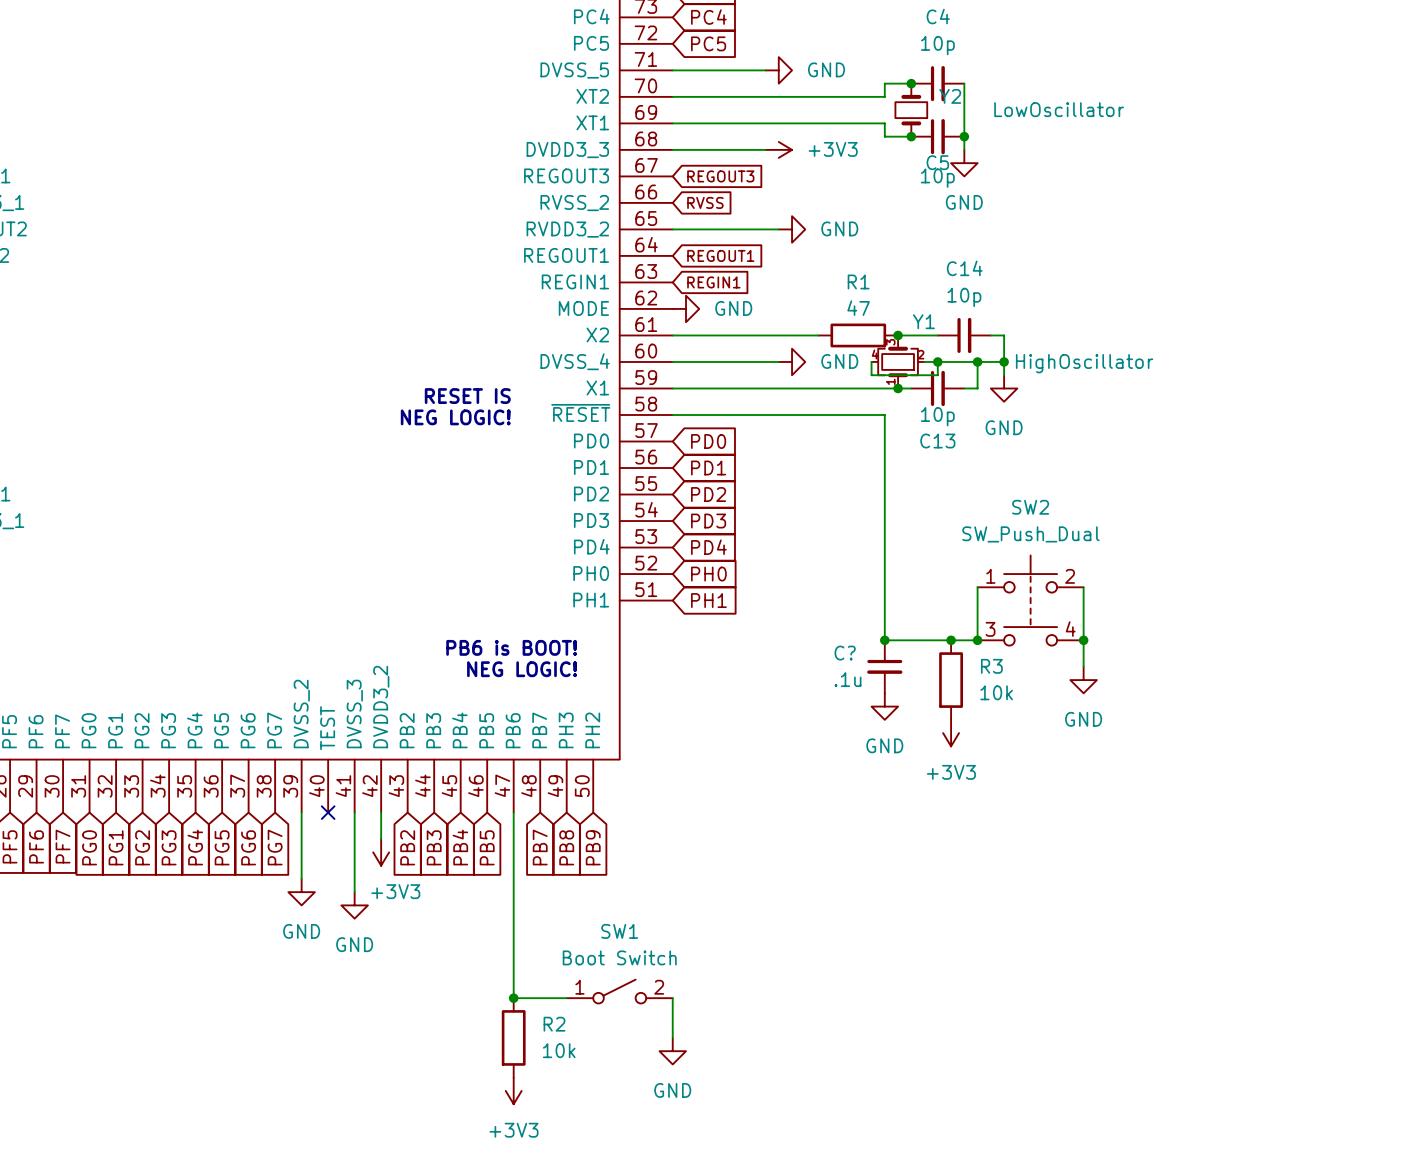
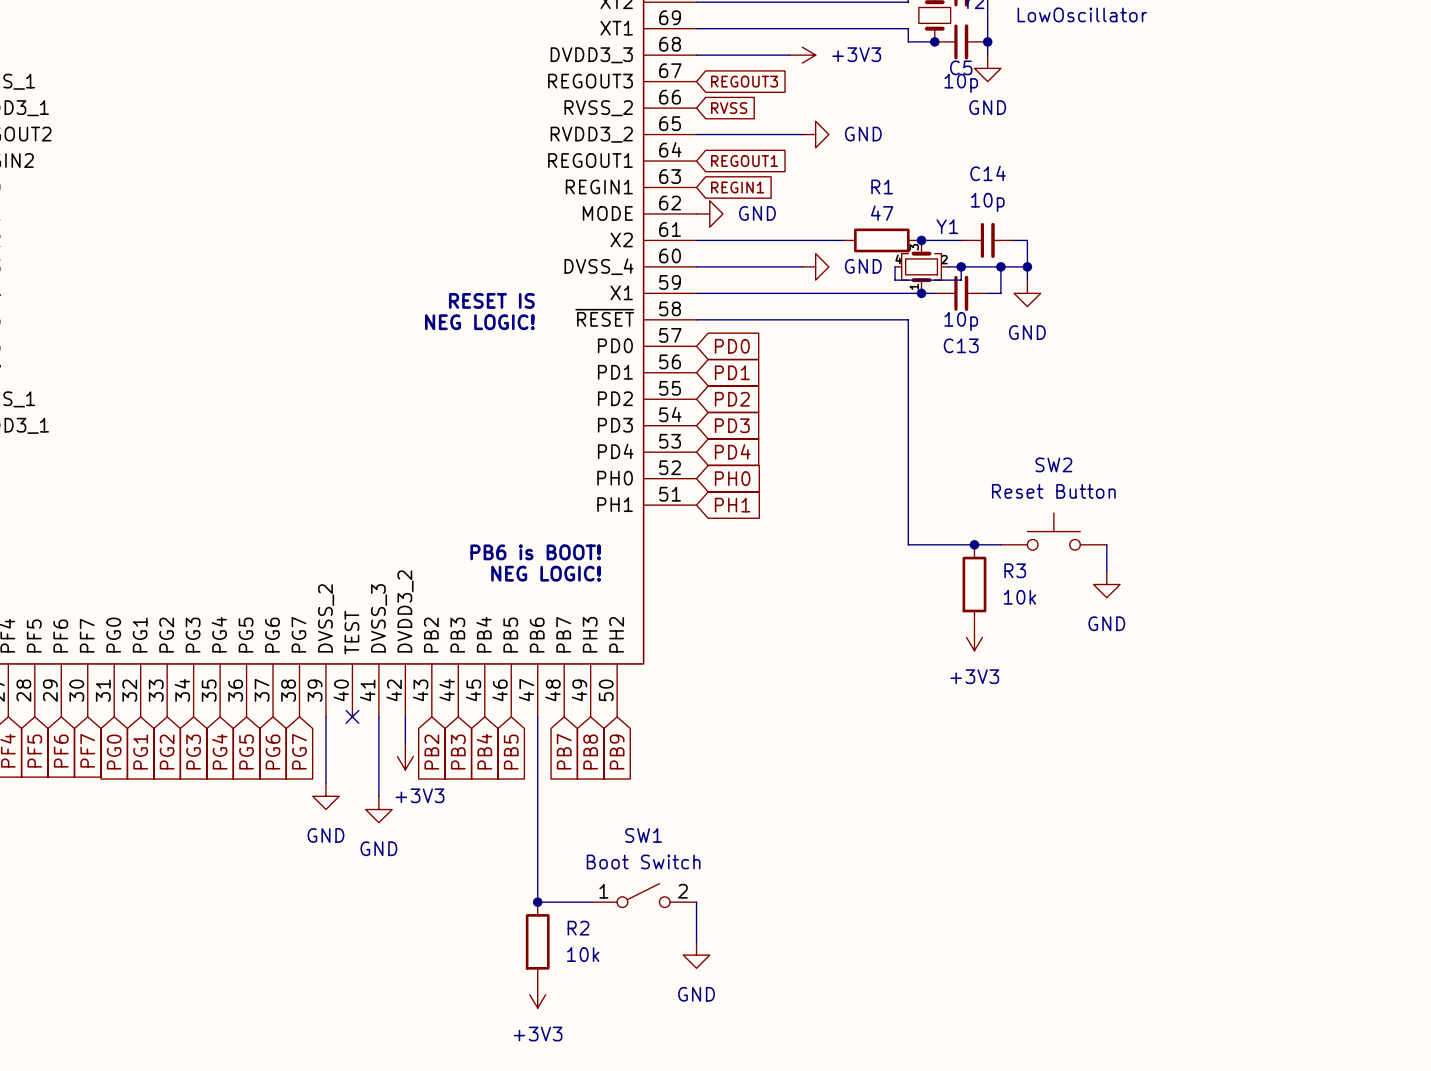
Y1 value: HighOscillator (1084, 363) -> none
SW2 name position: SW2 (1030, 507) -> SW2 (1053, 464)
SW2 value: SW_Push_Dual (1030, 534) -> Reset Button (1053, 491)
SW2 symbol: [977, 555, 1084, 646] -> [1000, 513, 1107, 551]
wire: (977, 587) (977, 640) -> none
wire: (1083, 587) (1083, 640) -> none
junction: (884, 640) -> none
junction: (977, 640) -> none
junction: (1083, 640) -> none
C?: .1u (884, 666) -> none
power symbol: GND (884, 706) -> none

